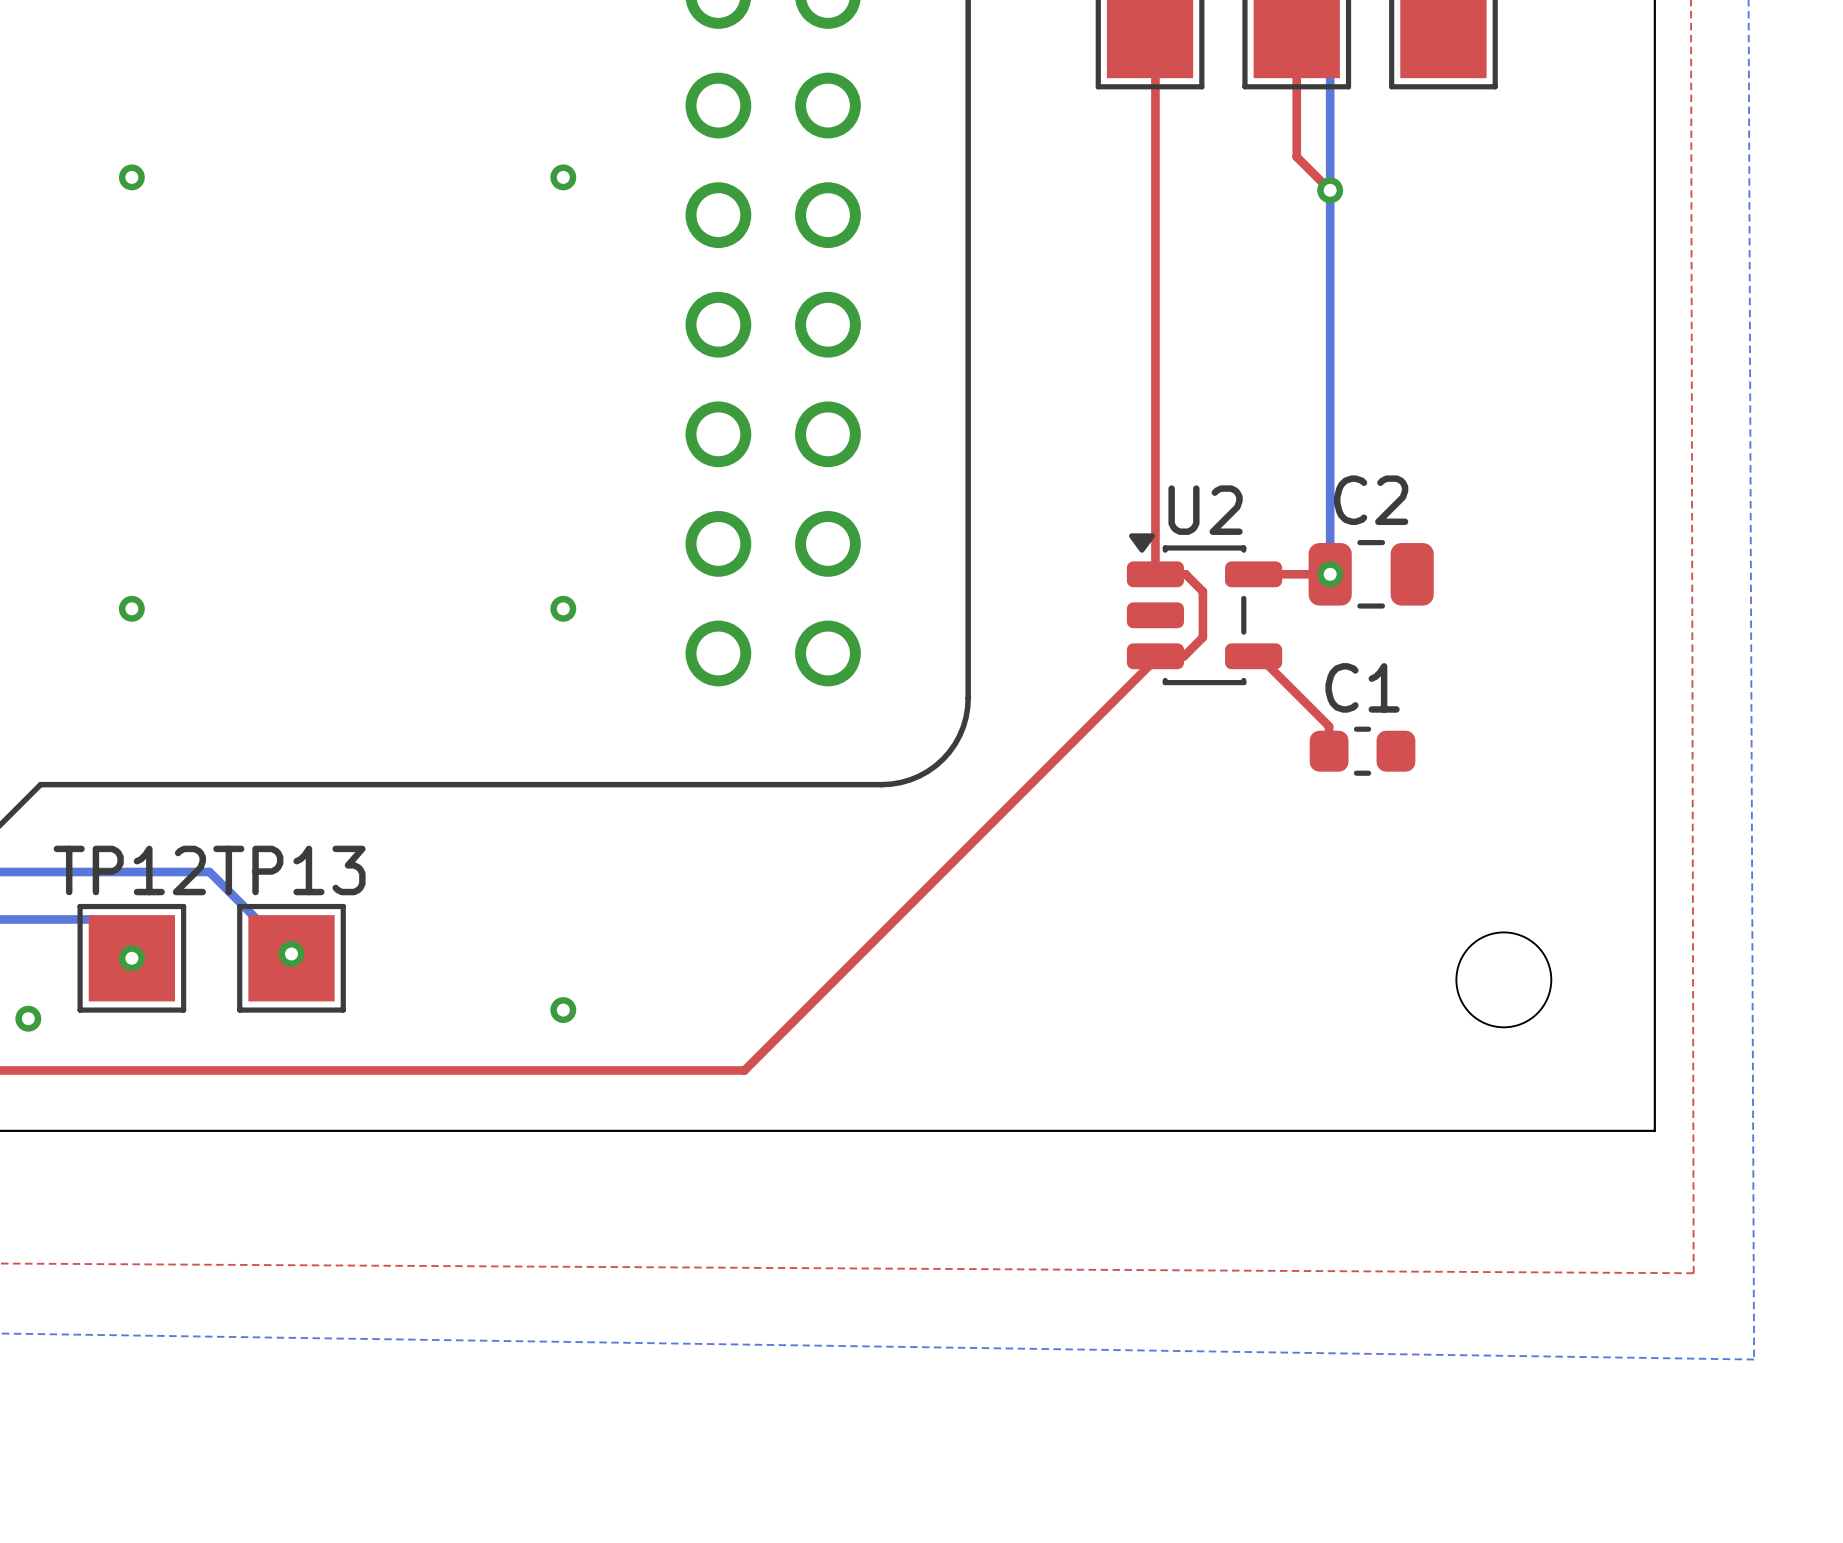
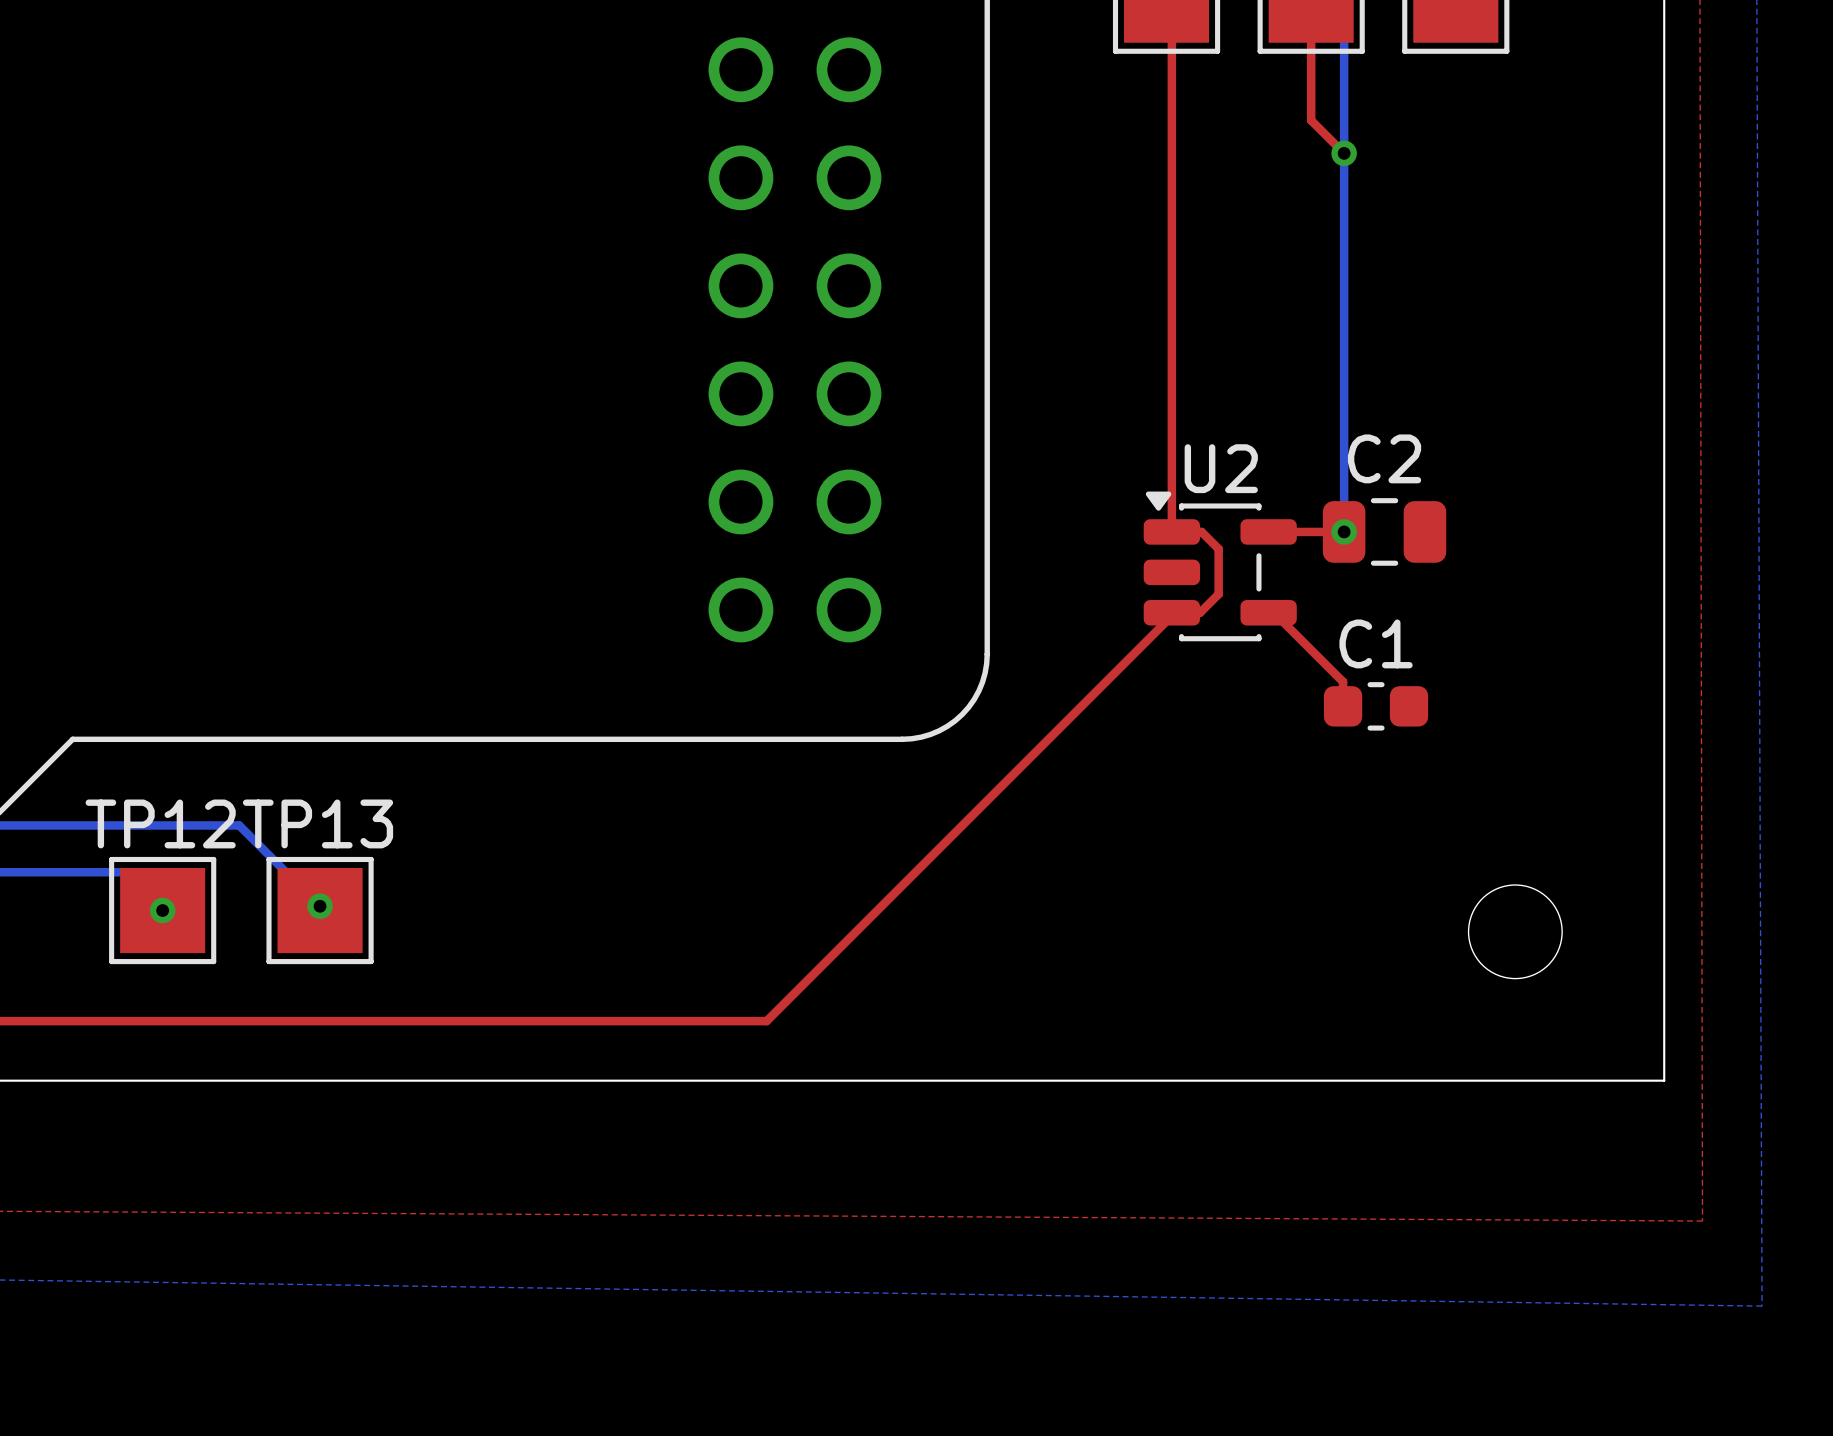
via: (131, 177) -> none
via: (563, 177) -> none
via: (131, 608) -> none
via: (563, 608) -> none
via: (563, 1010) -> none
via: (28, 1018) -> none

